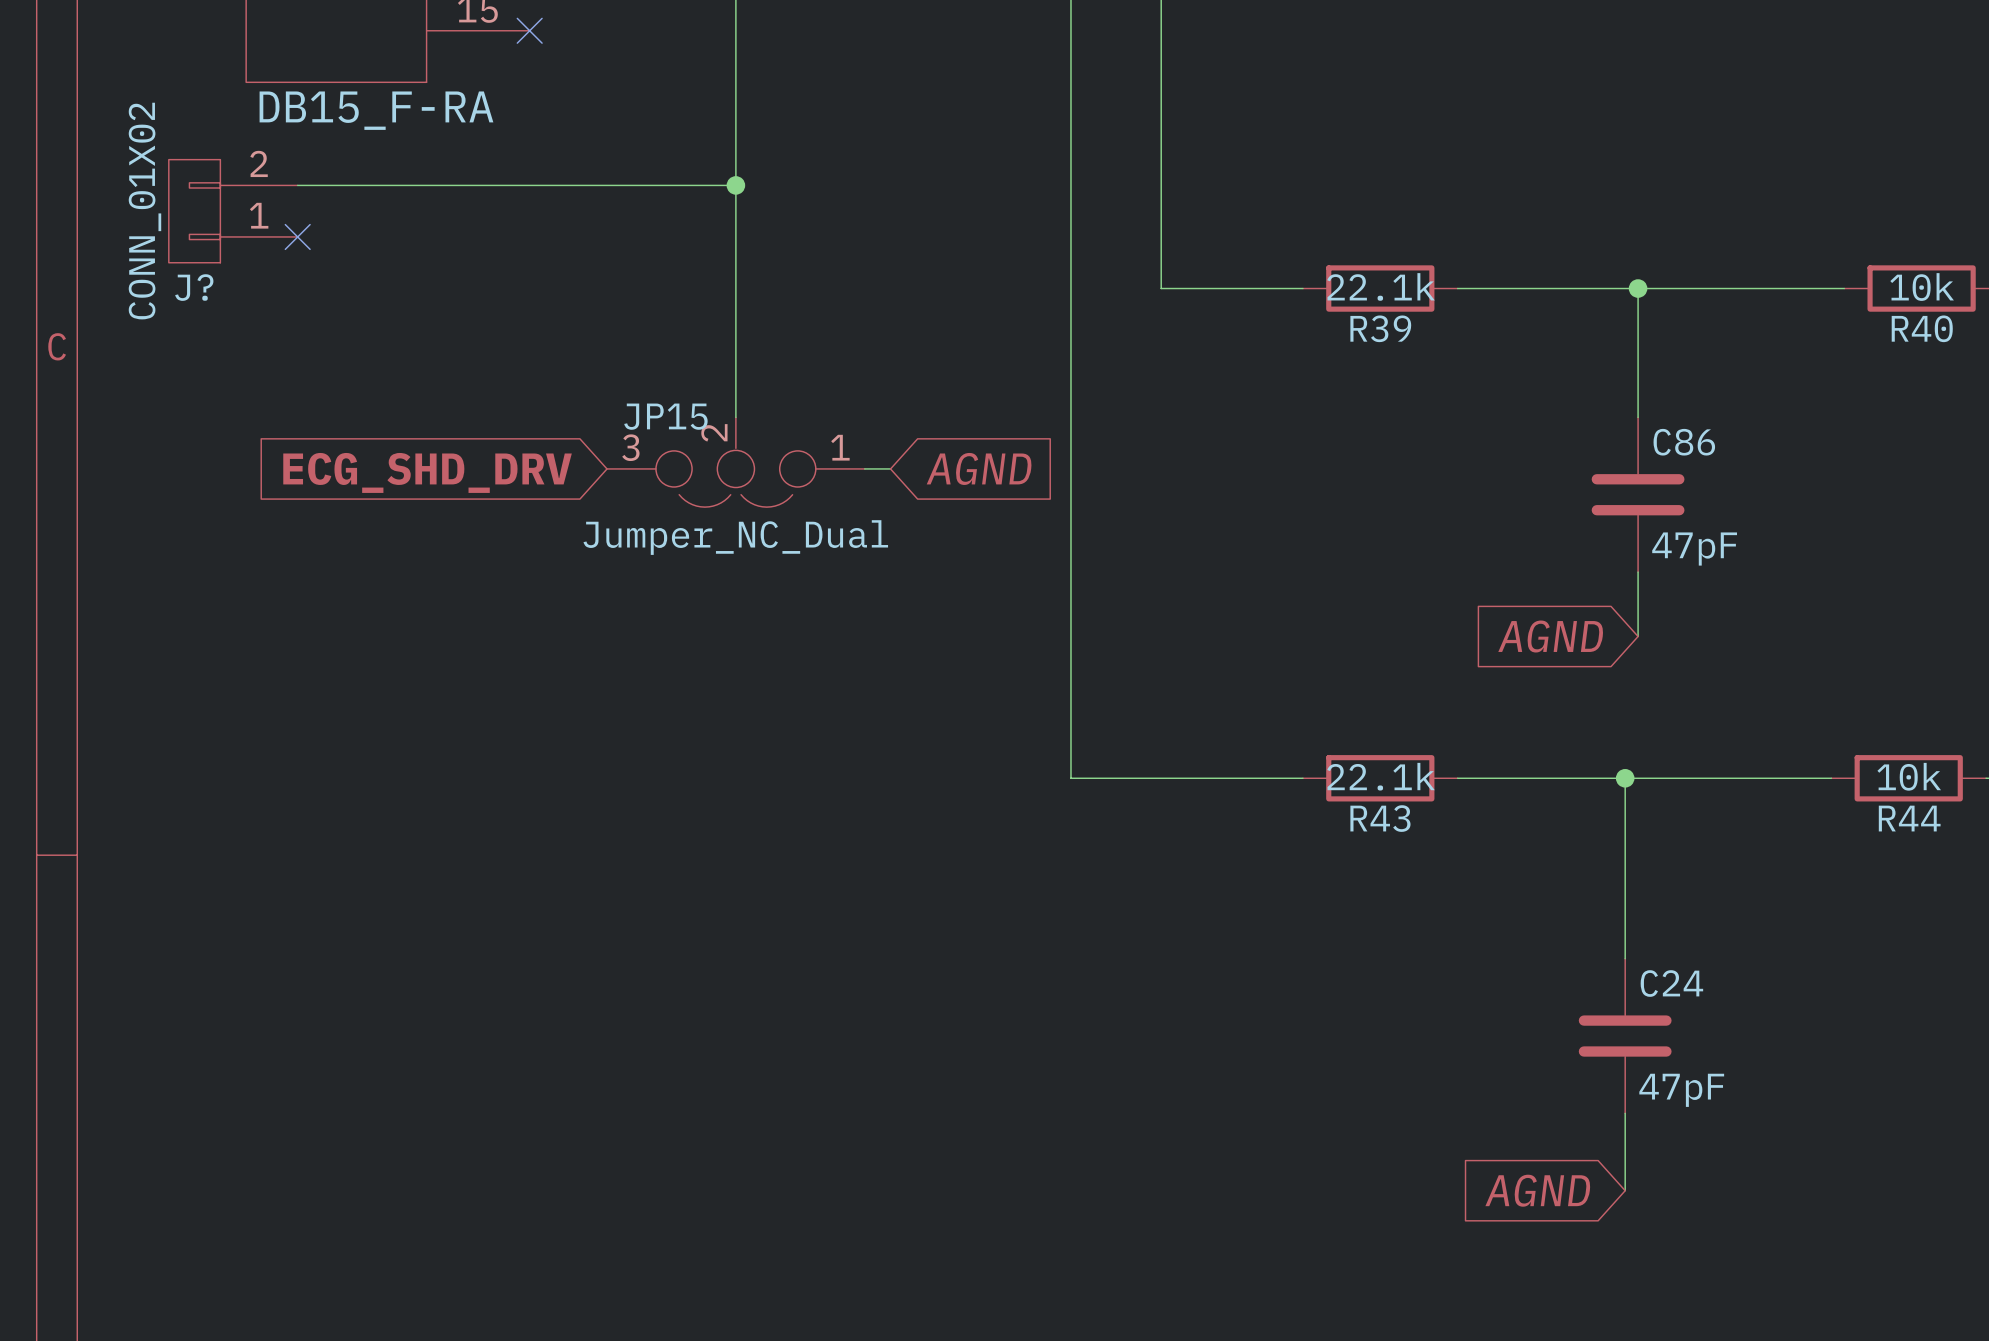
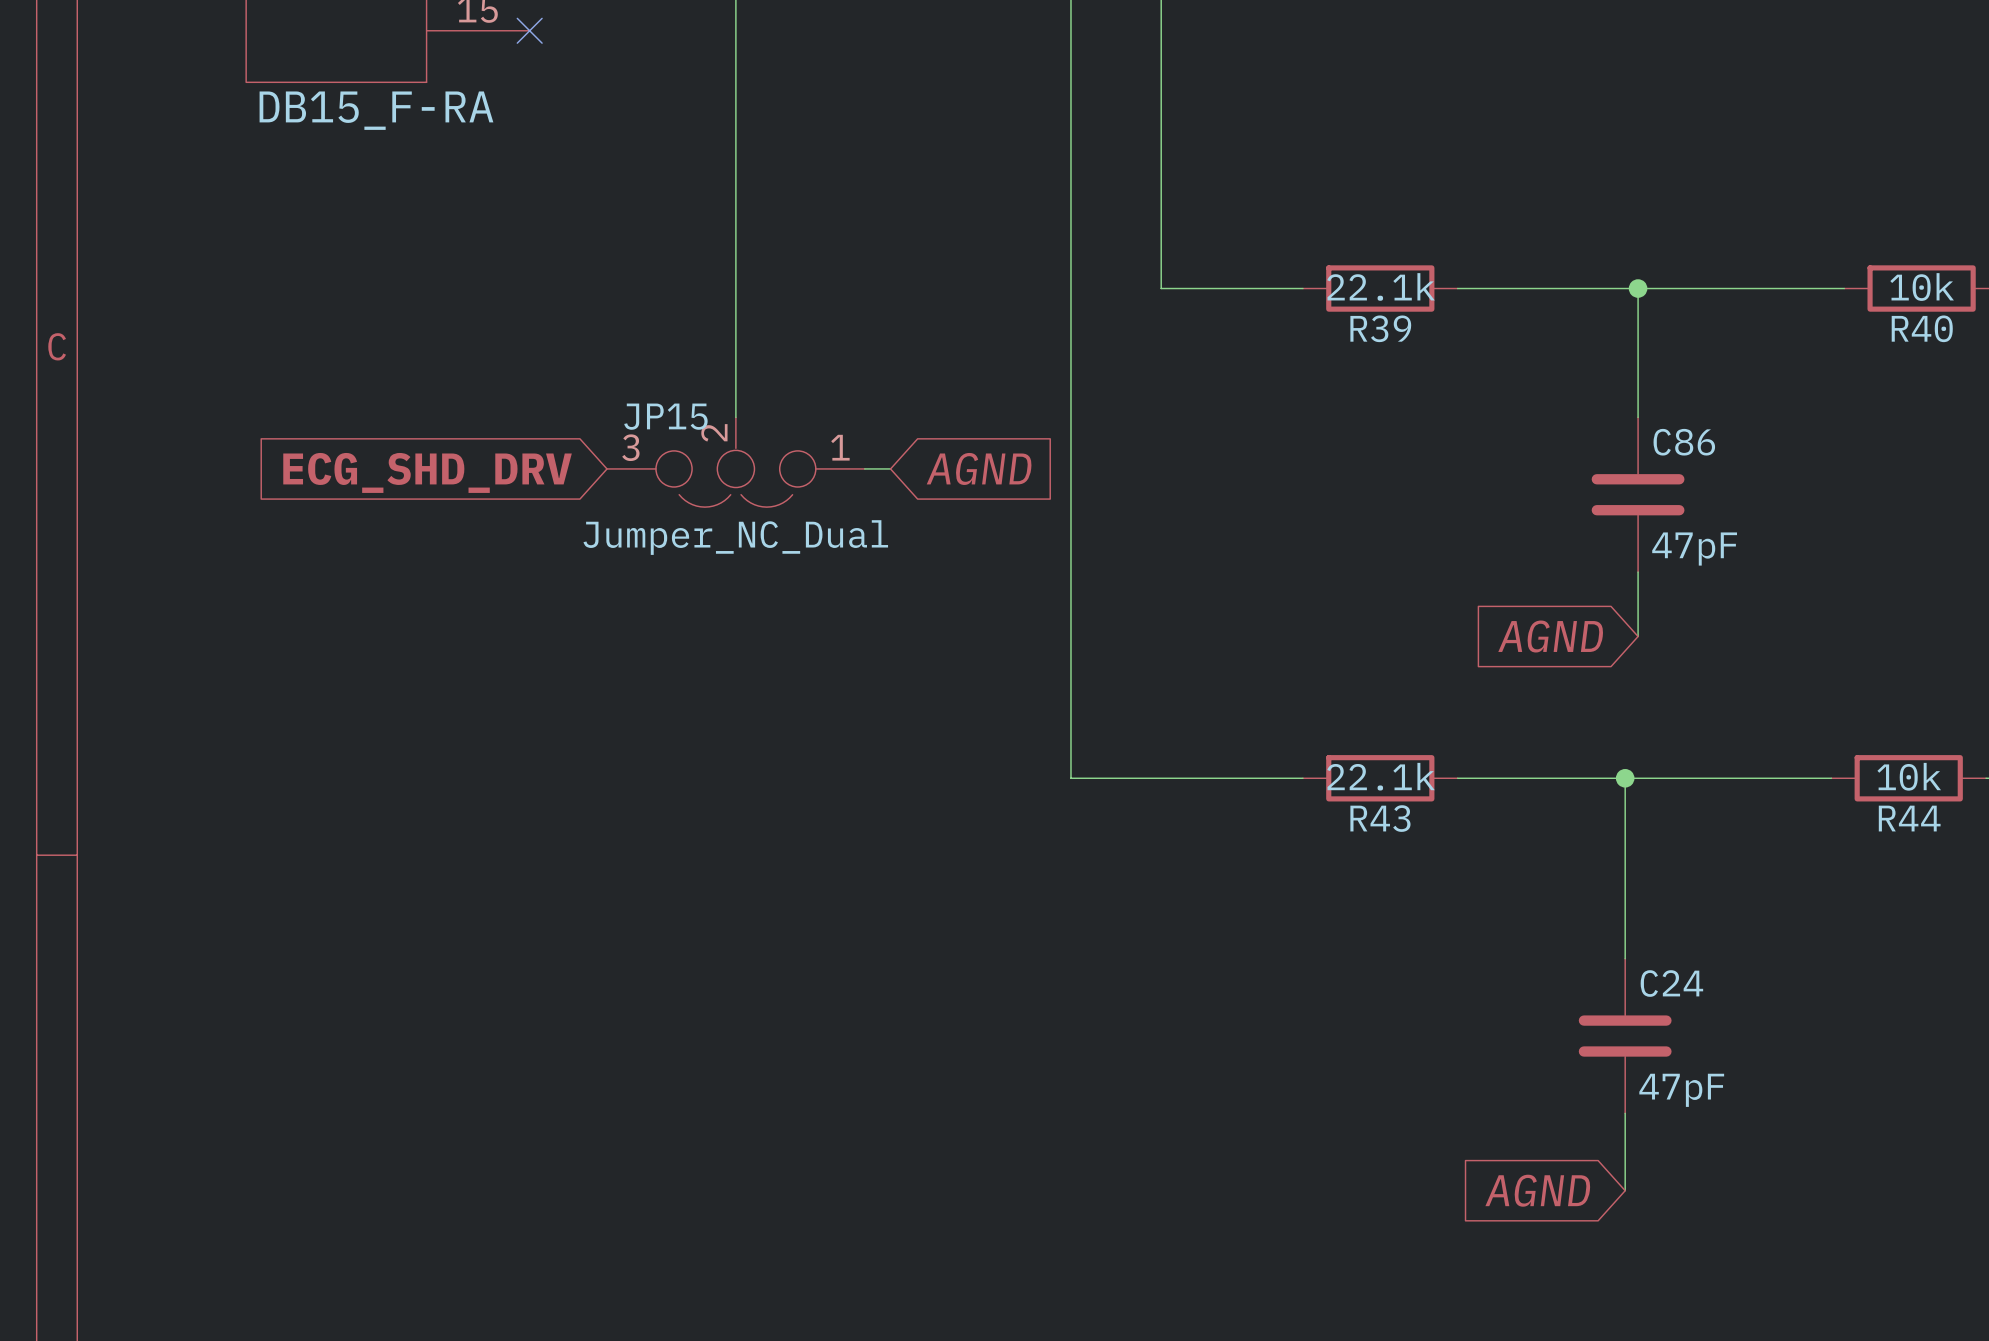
wire: (297, 185) (735, 185) -> none
junction: (735, 185) -> none
J?: CONN_01X02 (233, 211) -> none
no-connect mark: (297, 236) -> none

